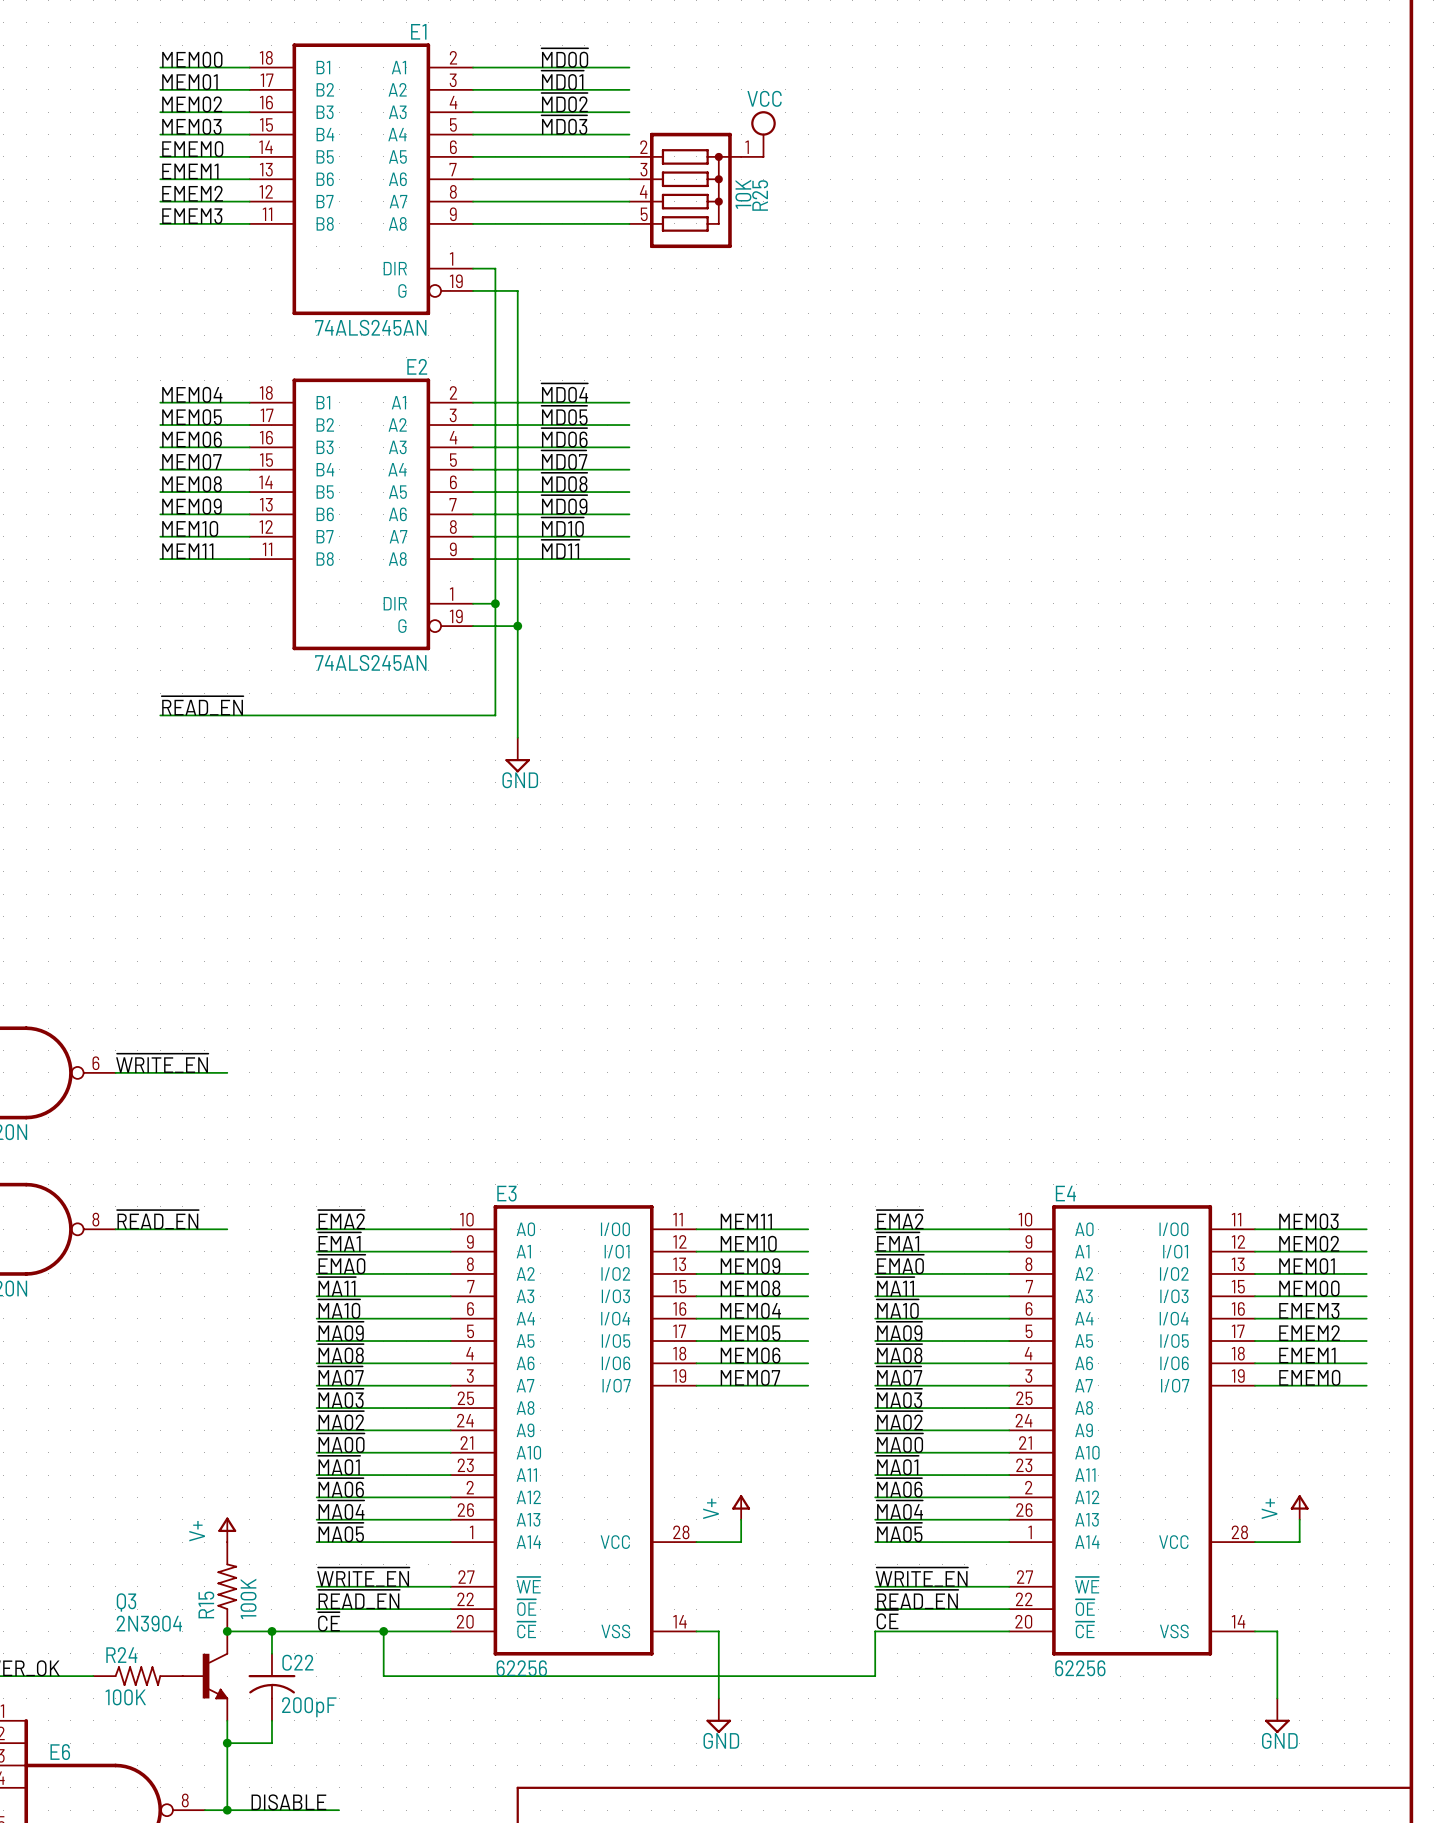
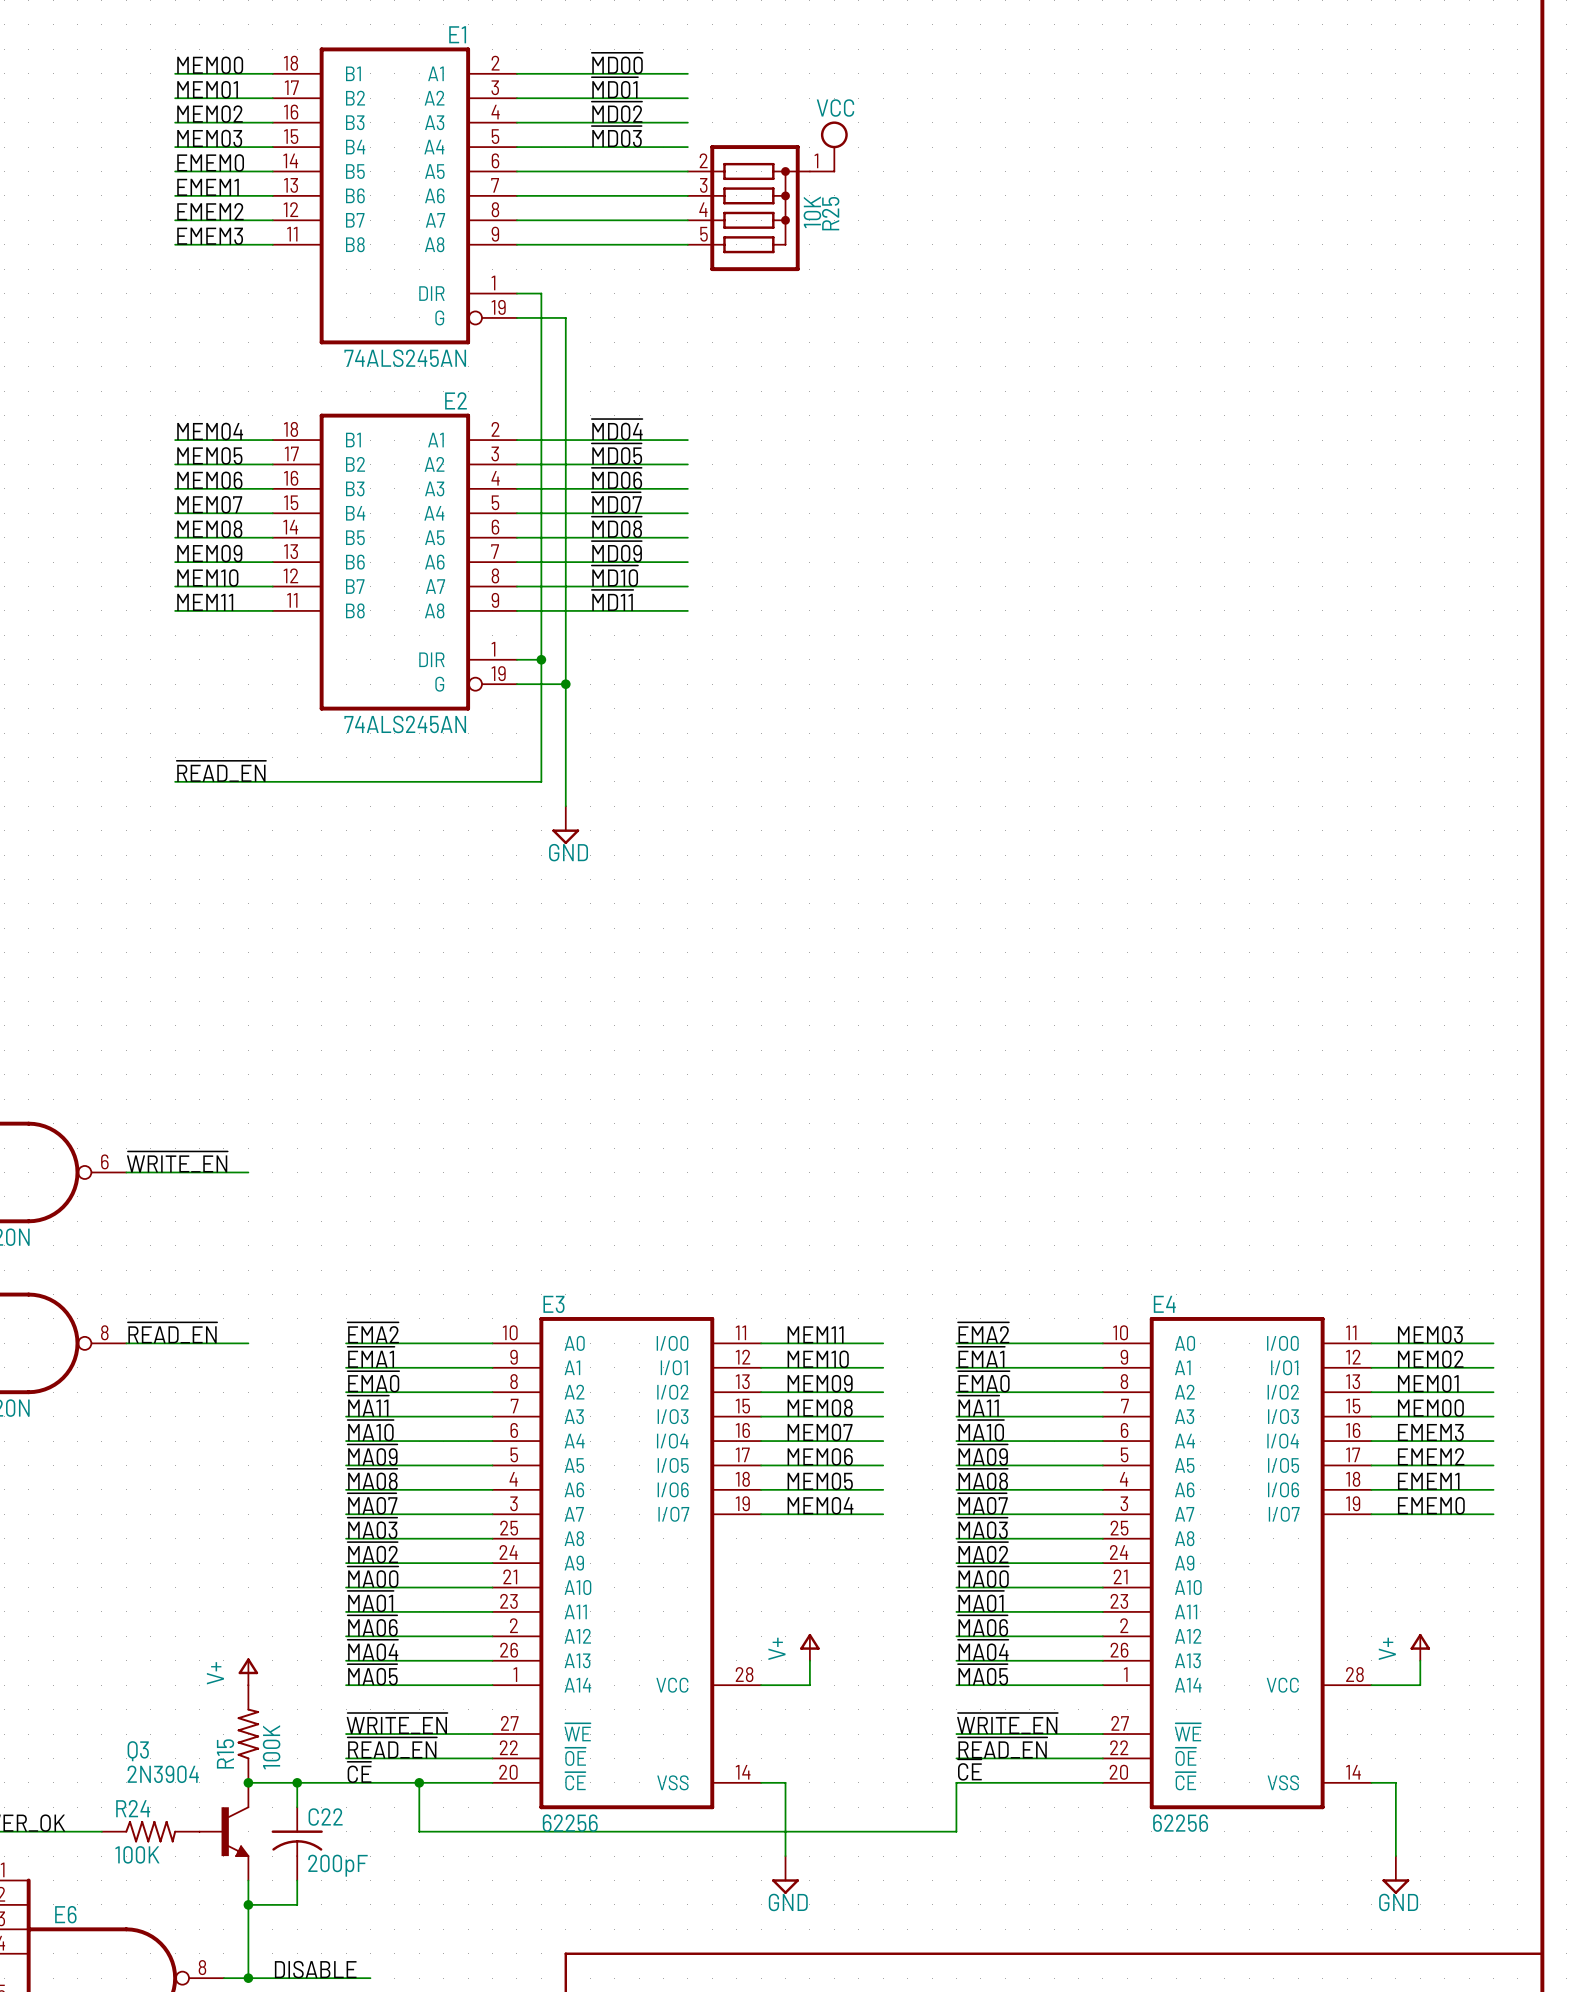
label: MEM04 (750, 1310) -> MEM07 (820, 1432)
label: MEM05 (750, 1333) -> MEM06 (820, 1456)
label: MEM06 (750, 1355) -> MEM05 (820, 1481)
label: MEM07 (750, 1377) -> MEM04 (820, 1505)

